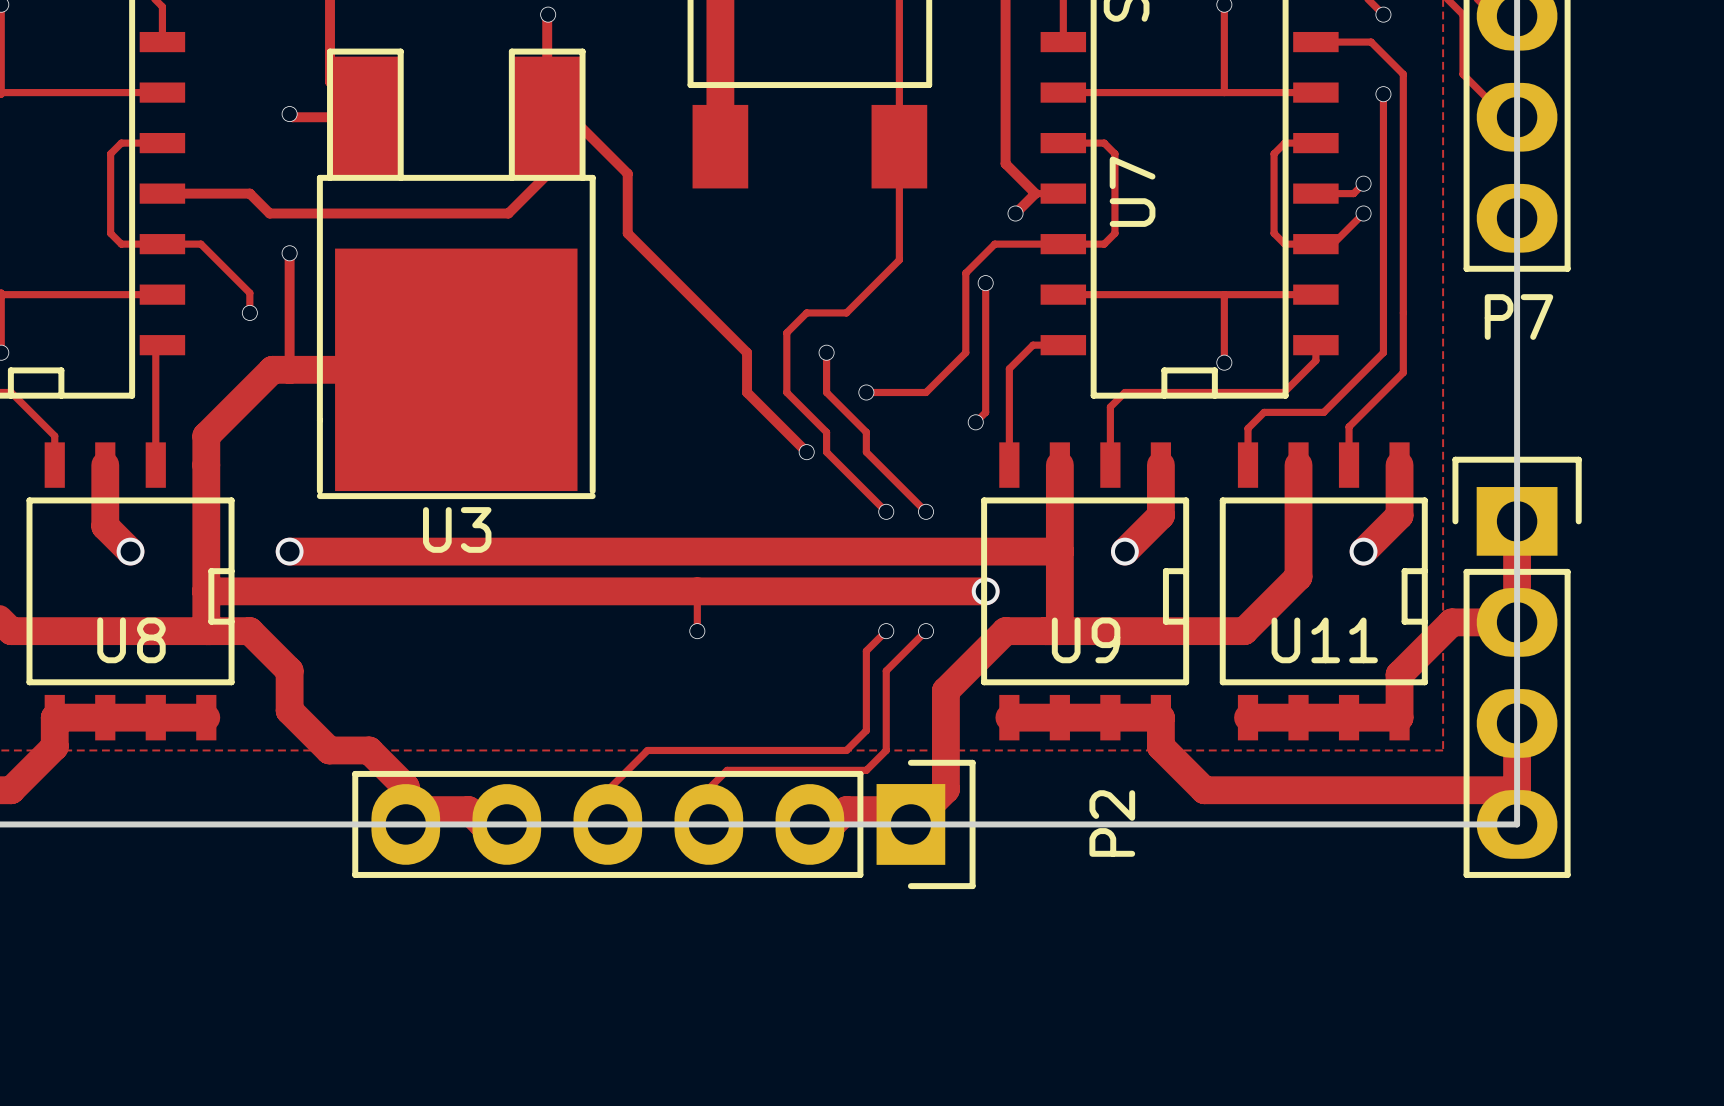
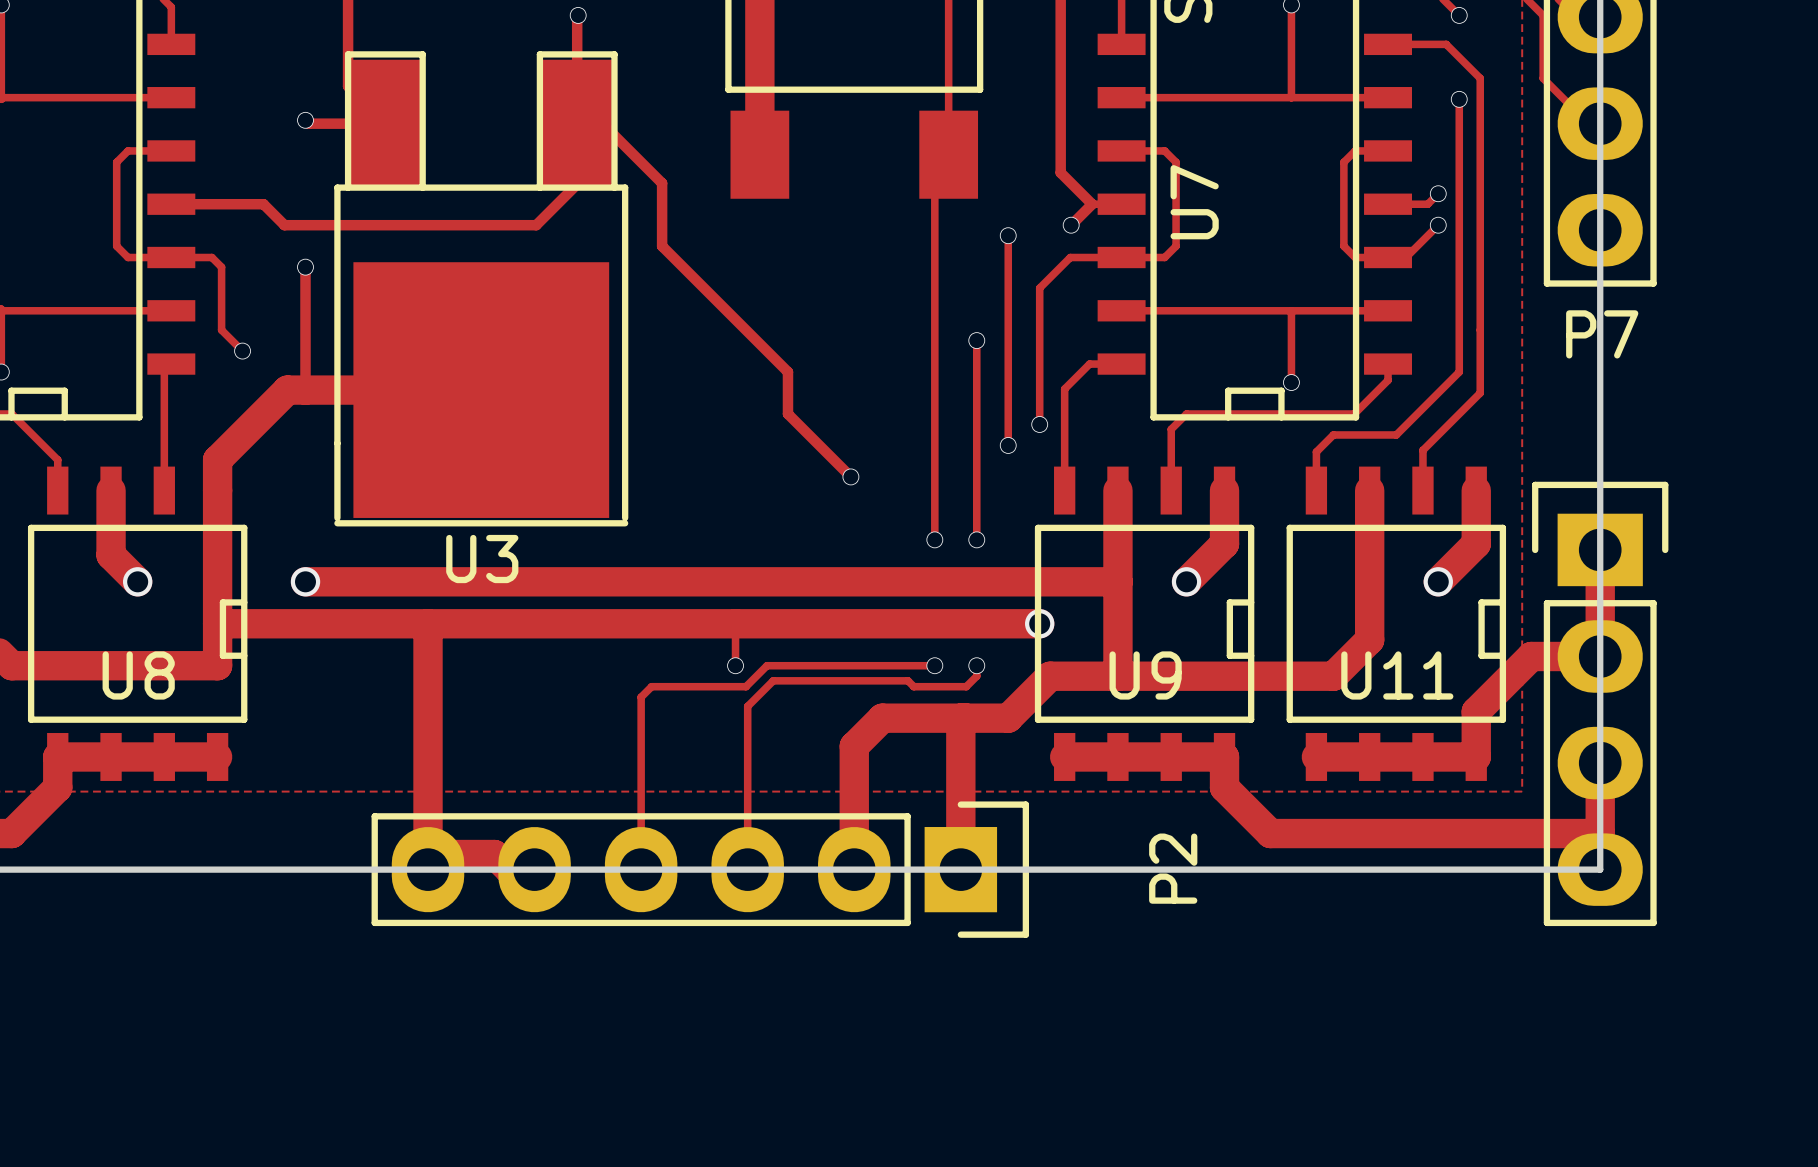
track: (899, 146) (899, 260) (846, 312) (806, 312) (786, 332) (786, 392) (826, 432) (826, 452) (886, 511) -> (948, 154) (934, 168) (934, 539)
track: none -> (1008, 235) (1008, 445)
via: none -> (1008, 235)
track: (1014, 244) (994, 244) (965, 273) (965, 352) (926, 392) (866, 392) -> (1070, 257) (1039, 288) (1039, 298)
track: (210, 253) (249, 293) (249, 312) -> (221, 267) (221, 330) (242, 351)
via: (985, 283) -> none
via position: (249, 312) -> (242, 351)
via: none -> (976, 340)
track: (826, 352) (826, 392) (866, 432) (866, 452) (926, 511) -> (976, 340) (976, 539)
via: (826, 352) -> none
via: (866, 392) -> none
track: (985, 402) (985, 412) (975, 422) -> none
via: none -> (1039, 424)
via: none -> (1008, 445)
via: (975, 422) -> none
track: (1298, 576) (1244, 631) (1005, 631) (995, 641) -> (1369, 608) (1369, 639) (1333, 676) (1050, 676)
track: (206, 631) (249, 631) (289, 670) (289, 710) (329, 750) (369, 750) (405, 787) -> (428, 623) (428, 830)
track: (886, 631) (866, 651) (866, 730) (846, 750) (647, 750) (607, 790) -> (934, 665) (767, 665) (746, 686) (651, 686) (641, 697) (641, 833)
track: (926, 631) (886, 670) (886, 750) (866, 770) (727, 770) (708, 788) -> (976, 665) (976, 676) (966, 686) (913, 686) (907, 680) (773, 680) (747, 706) (747, 831)
track: none -> (960, 718) (960, 869)
track: (955, 680) (945, 690) (945, 789) (910, 824) (896, 810) (846, 810) (832, 824) (809, 824) -> (1008, 718) (882, 718) (854, 746) (854, 869)

